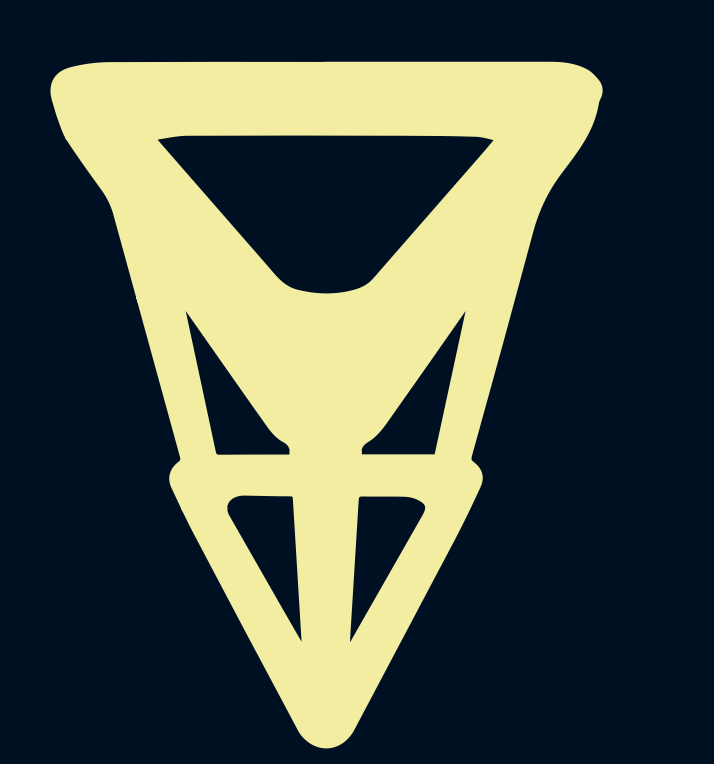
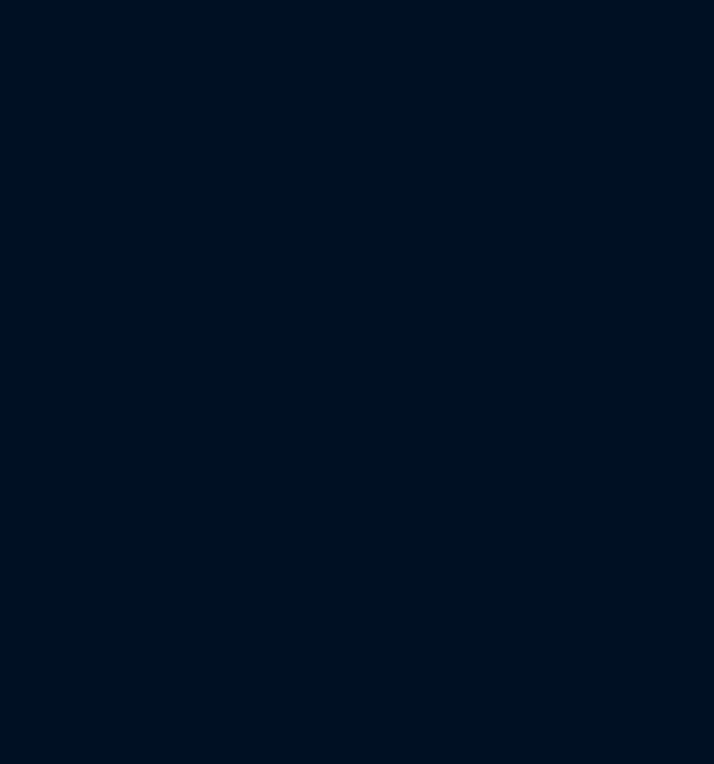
drawing: [50, 61, 603, 749] -> none

